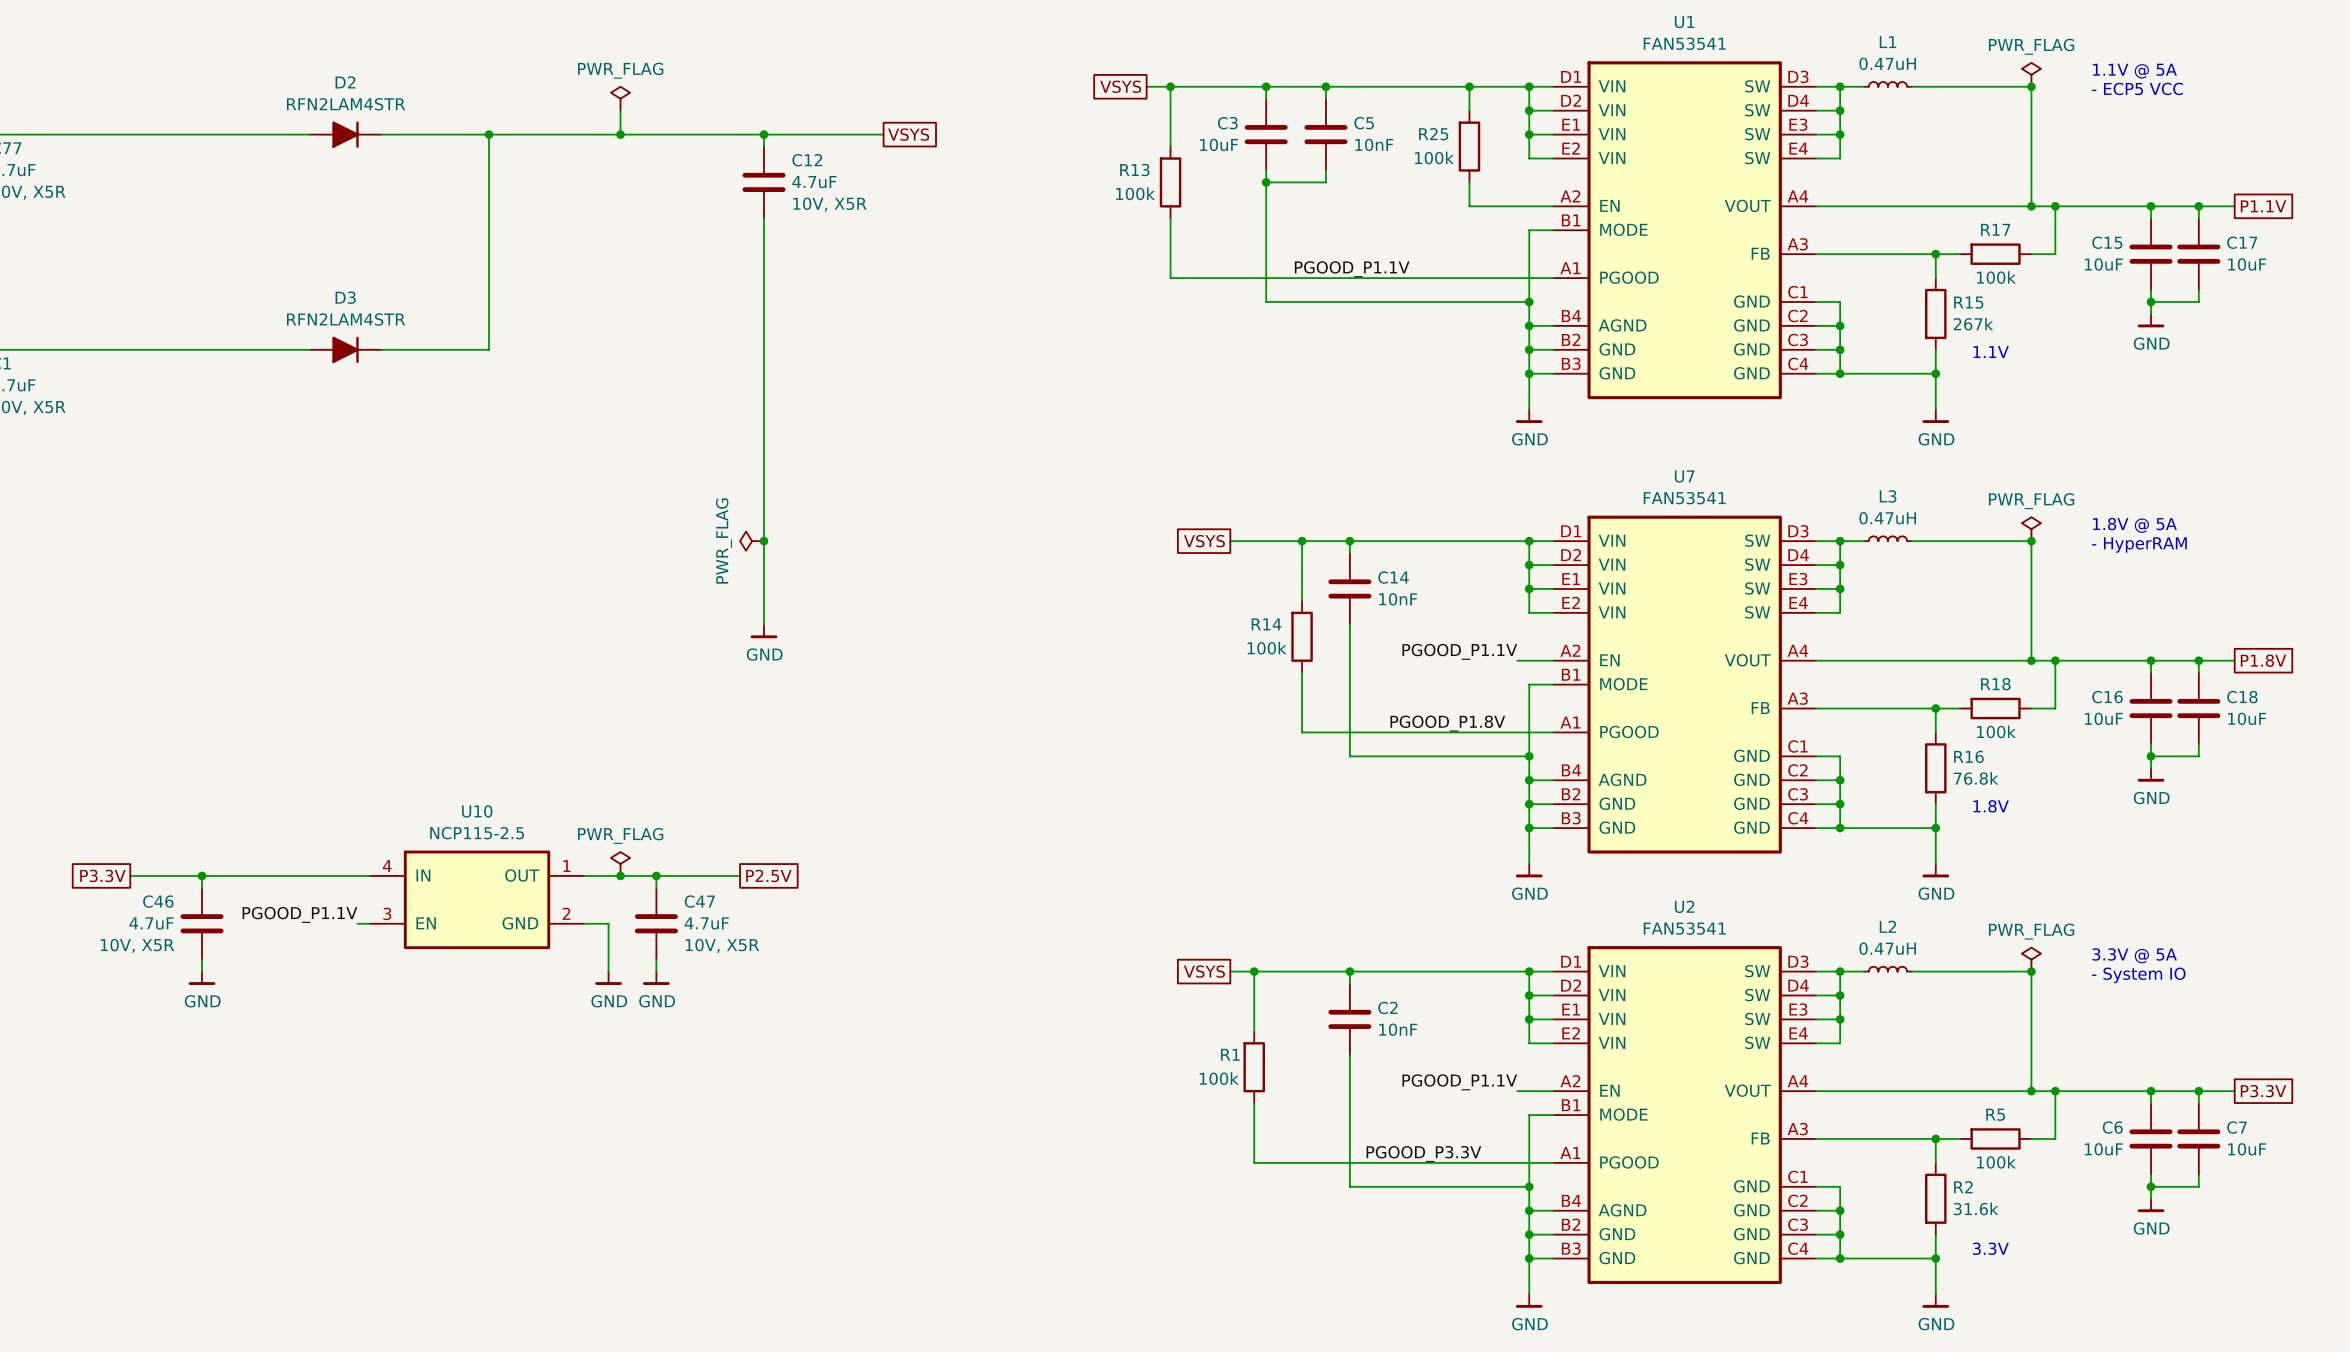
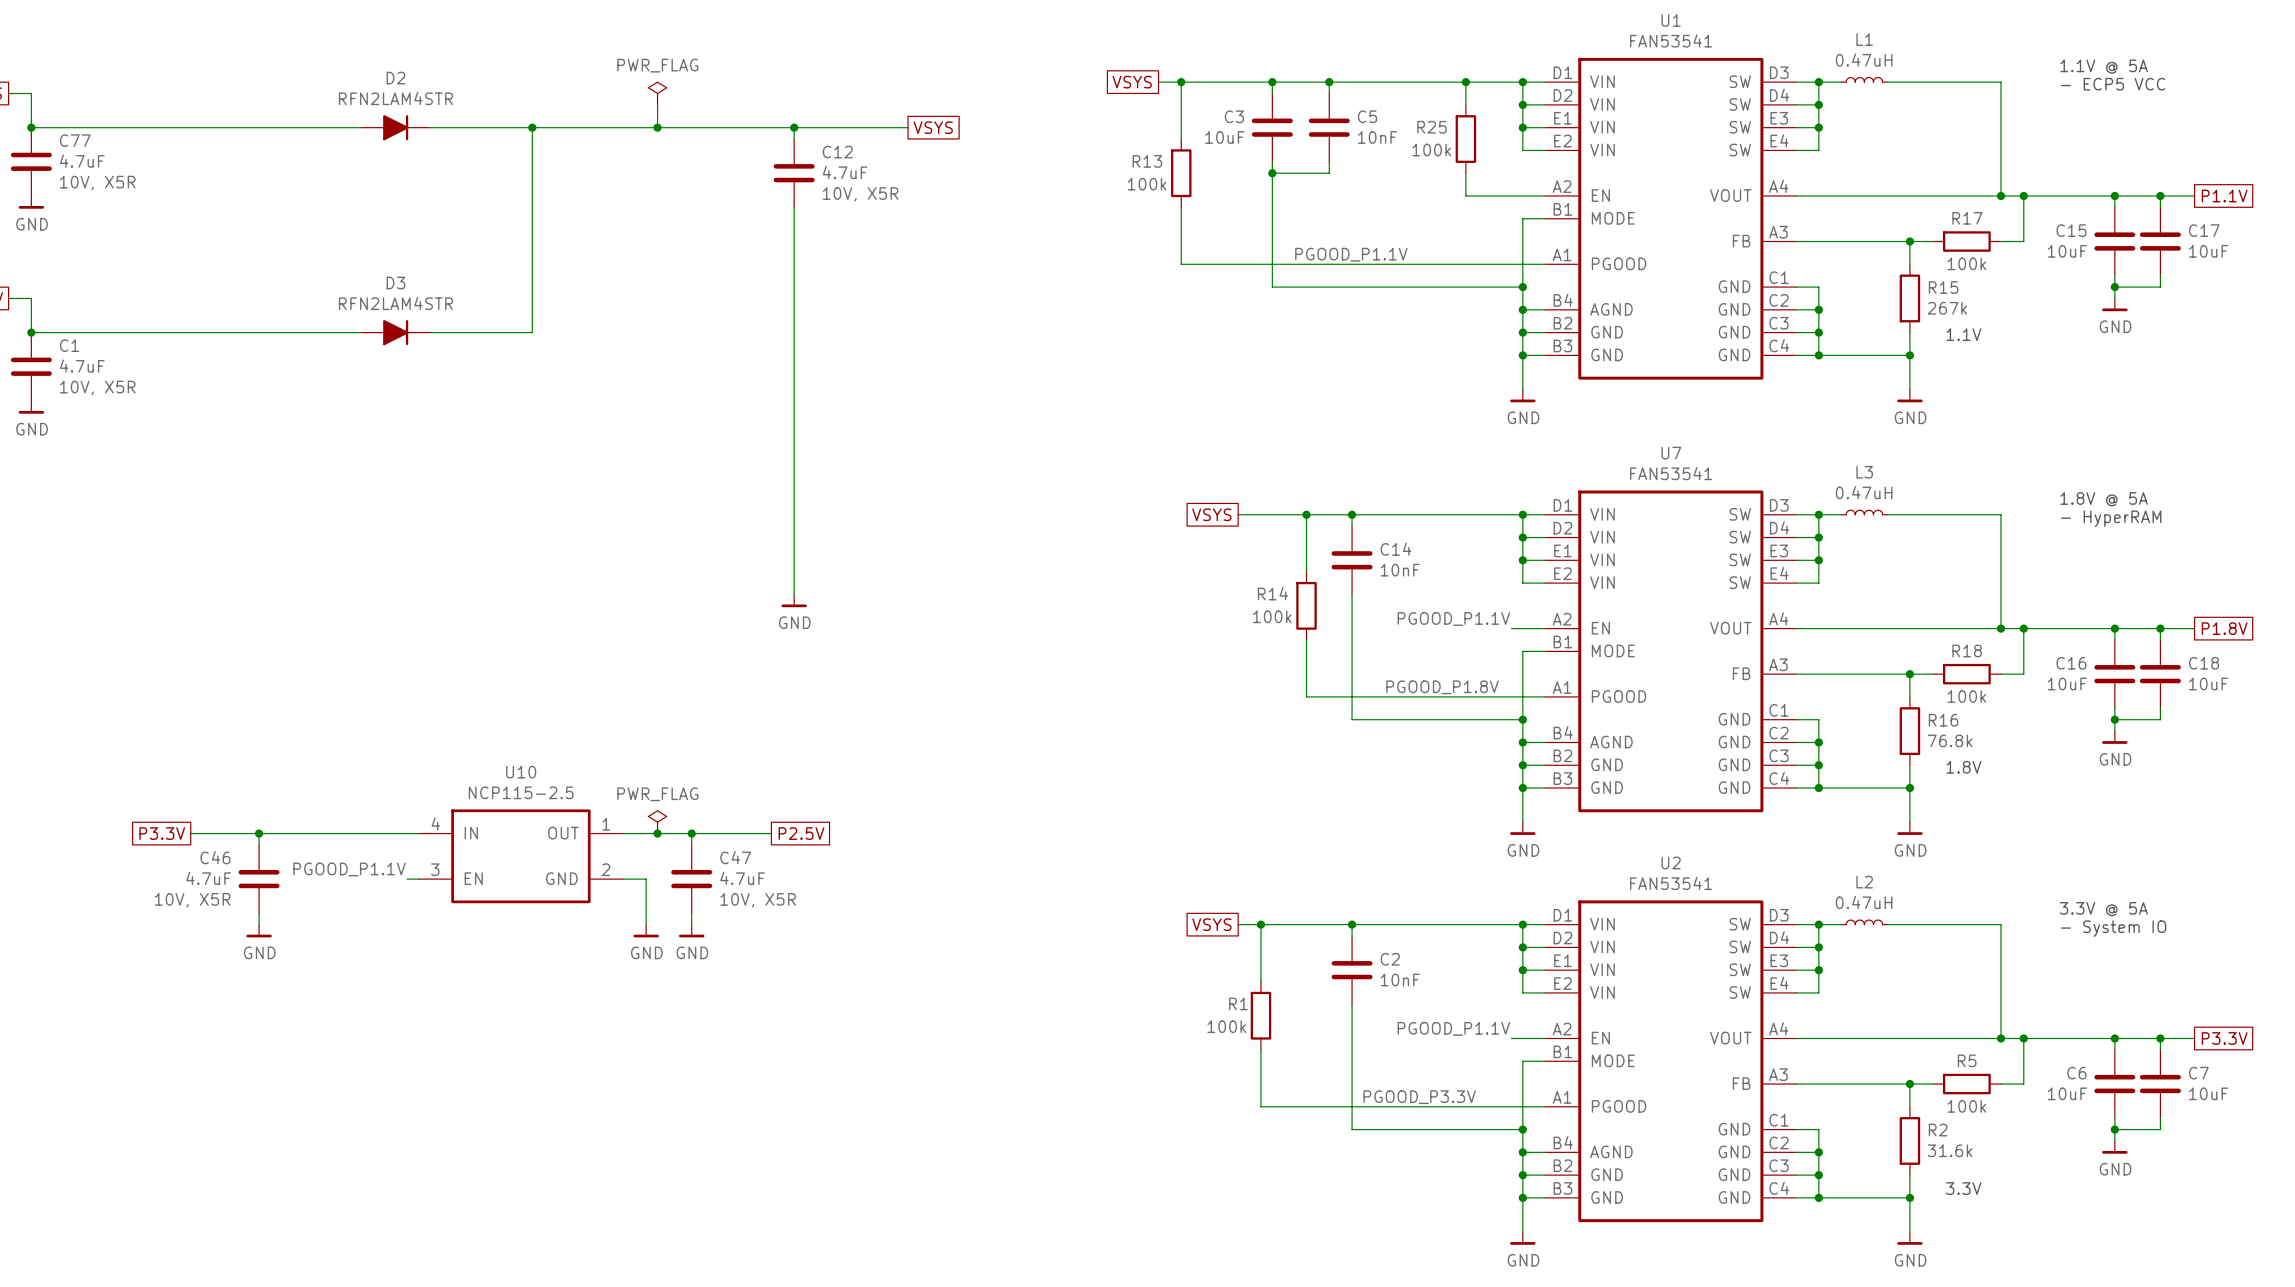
power symbol: PWR_FLAG (2031, 74) -> none
junction: (2031, 86) -> none
power symbol: PWR_FLAG (2031, 529) -> none
power symbol: PWR_FLAG (752, 541) -> none
junction: (764, 541) -> none
junction: (2031, 541) -> none
power symbol: PWR_FLAG (2031, 959) -> none
junction: (2031, 971) -> none

